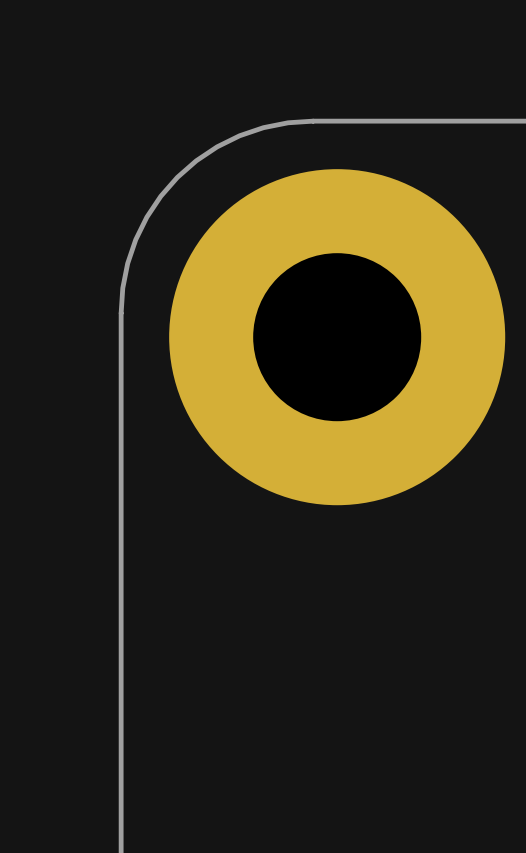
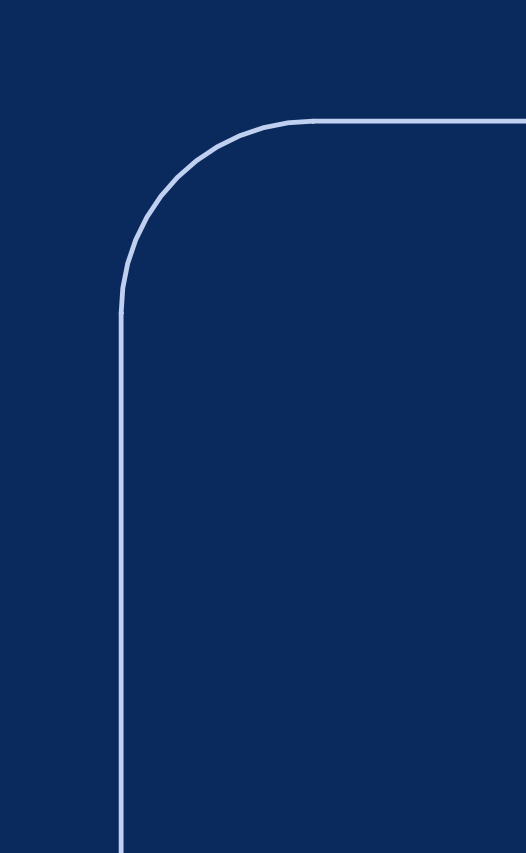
part: (337, 337) -> none

